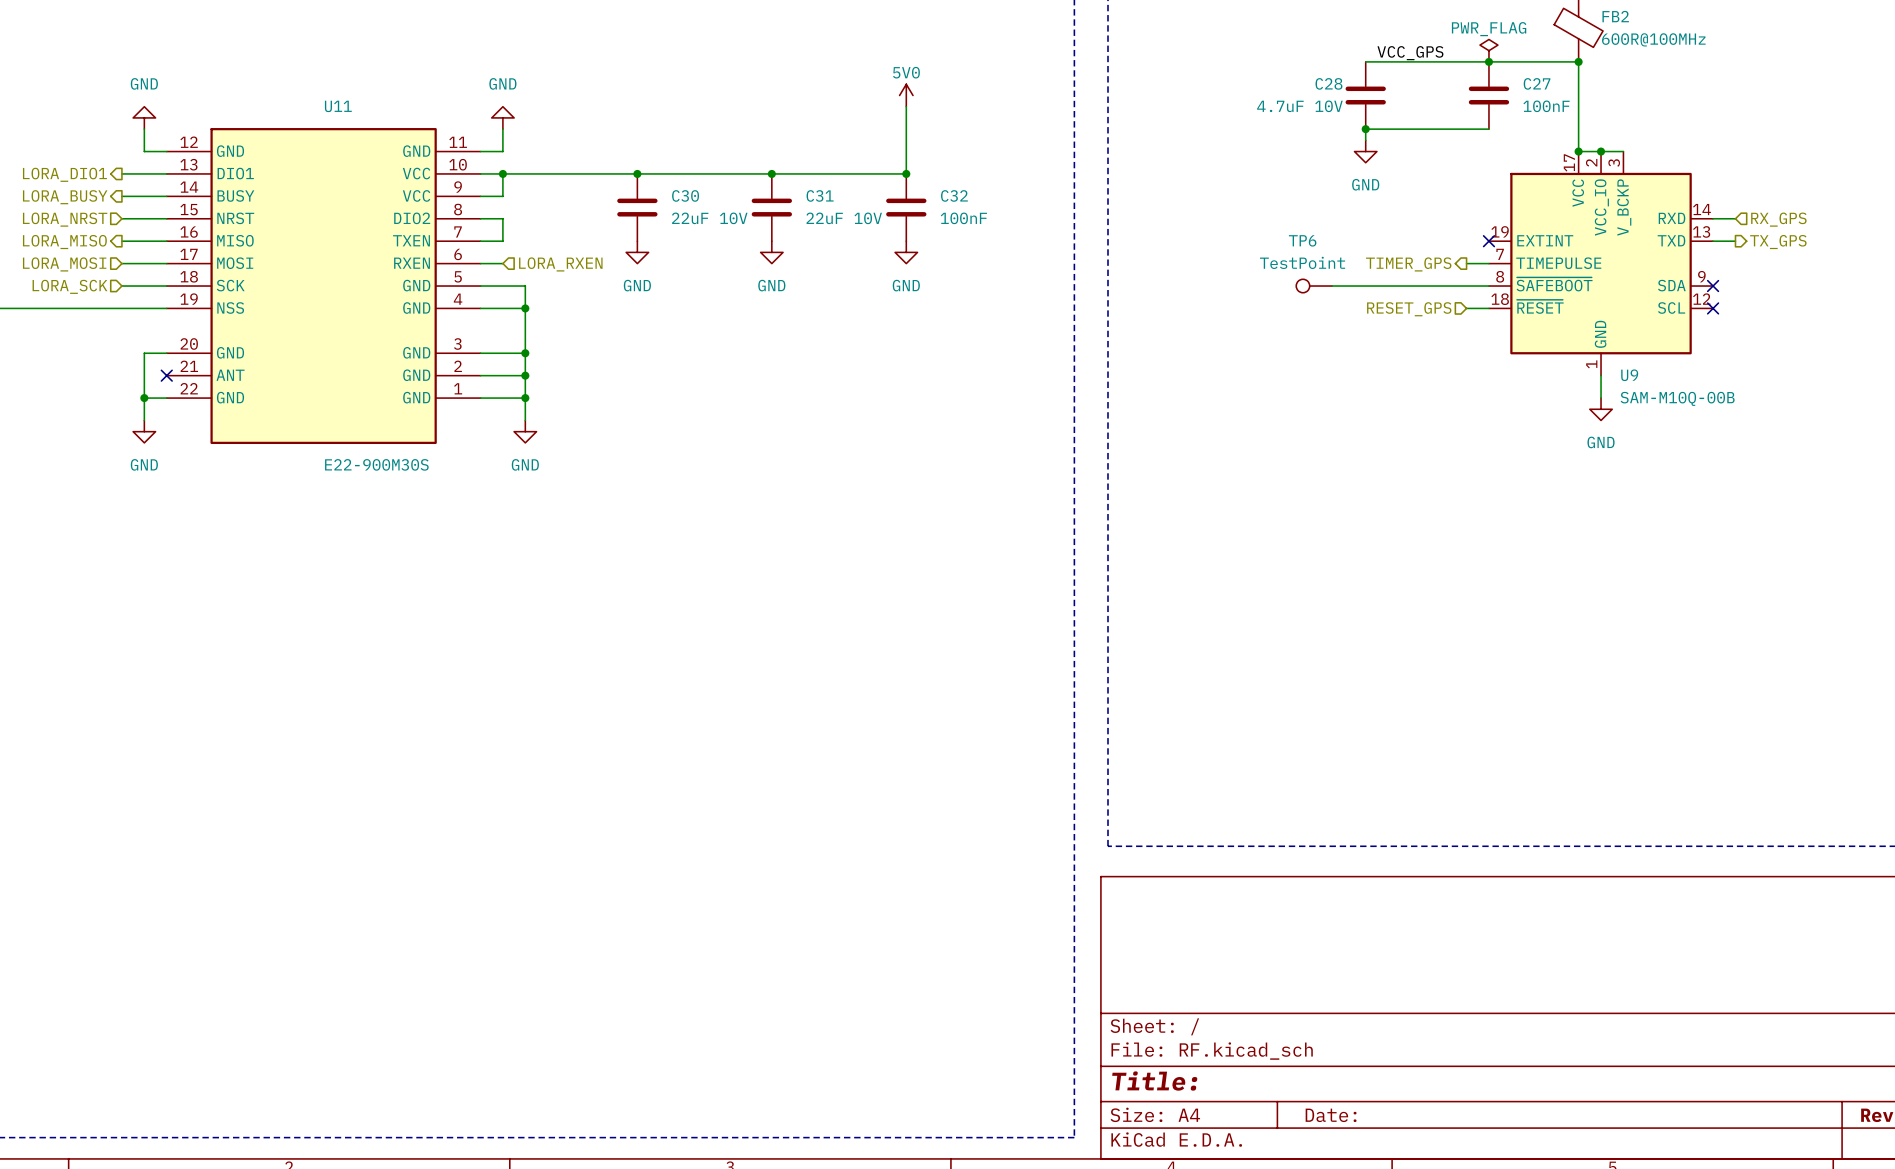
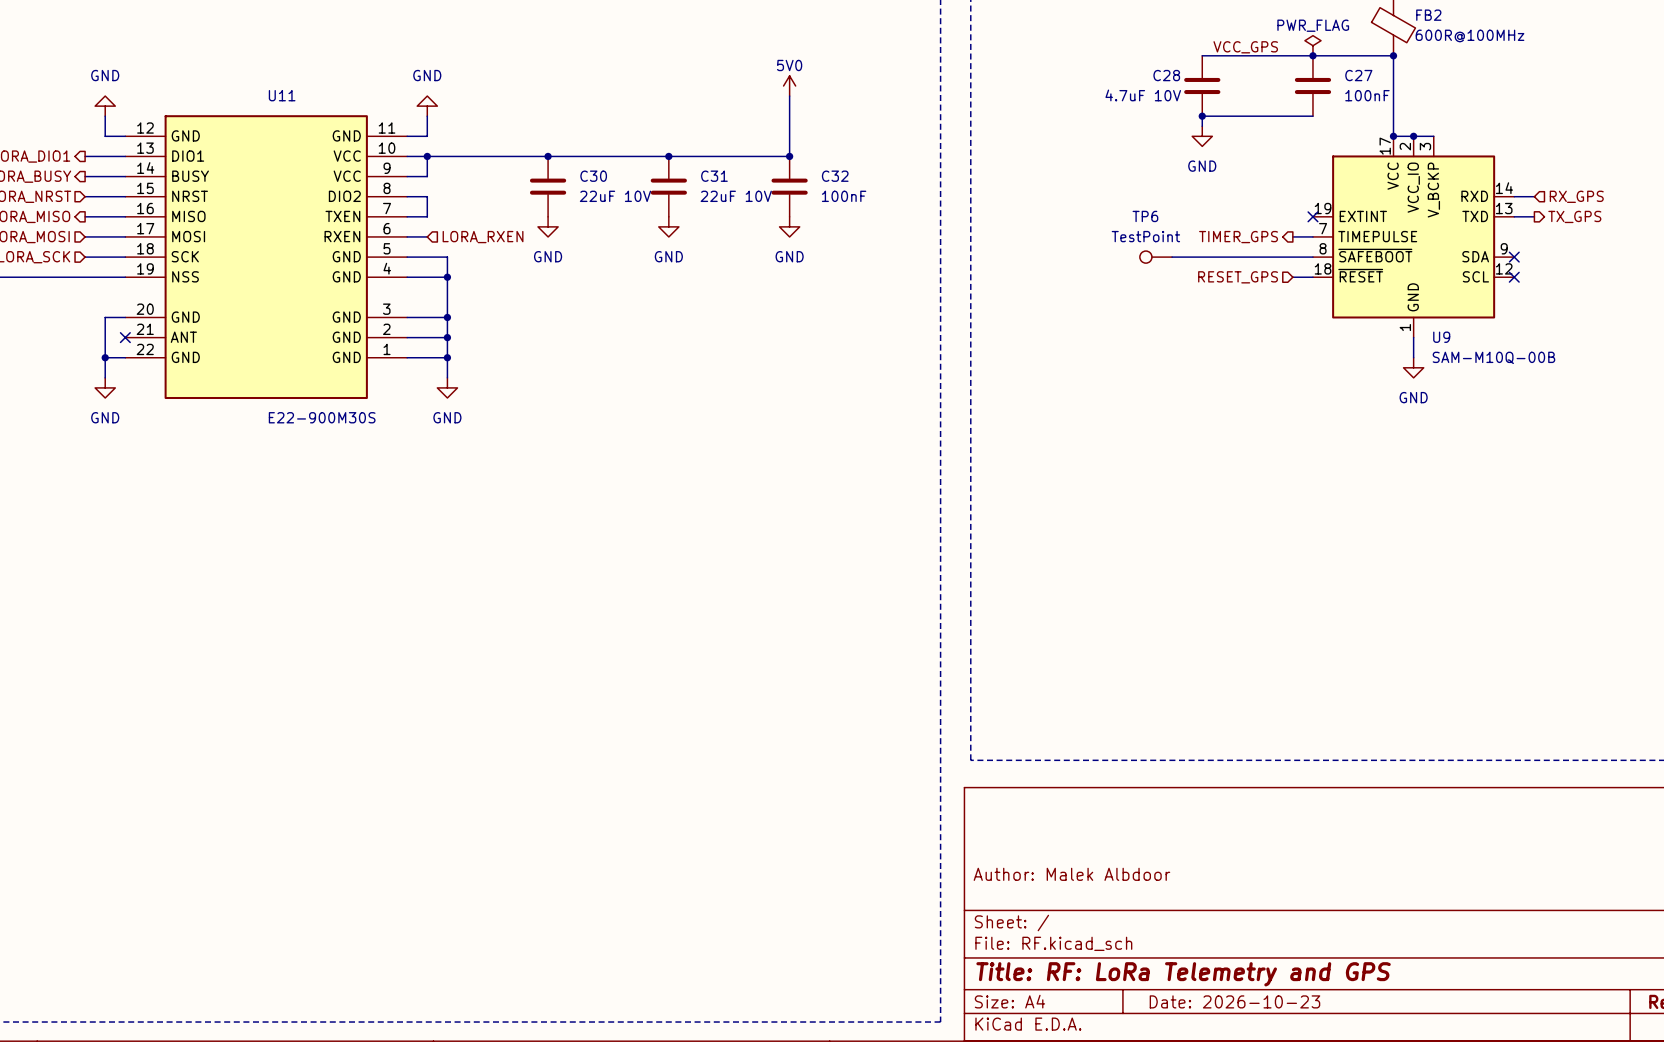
title block: none -> Author: Malek Albdoor (1071, 874)
title block: Title: (1154, 1081) -> Title: RF: LoRa Telemetry and GPS (1183, 974)
title block: Date: (1331, 1115) -> Date: 2026-10-23 (1234, 1001)

